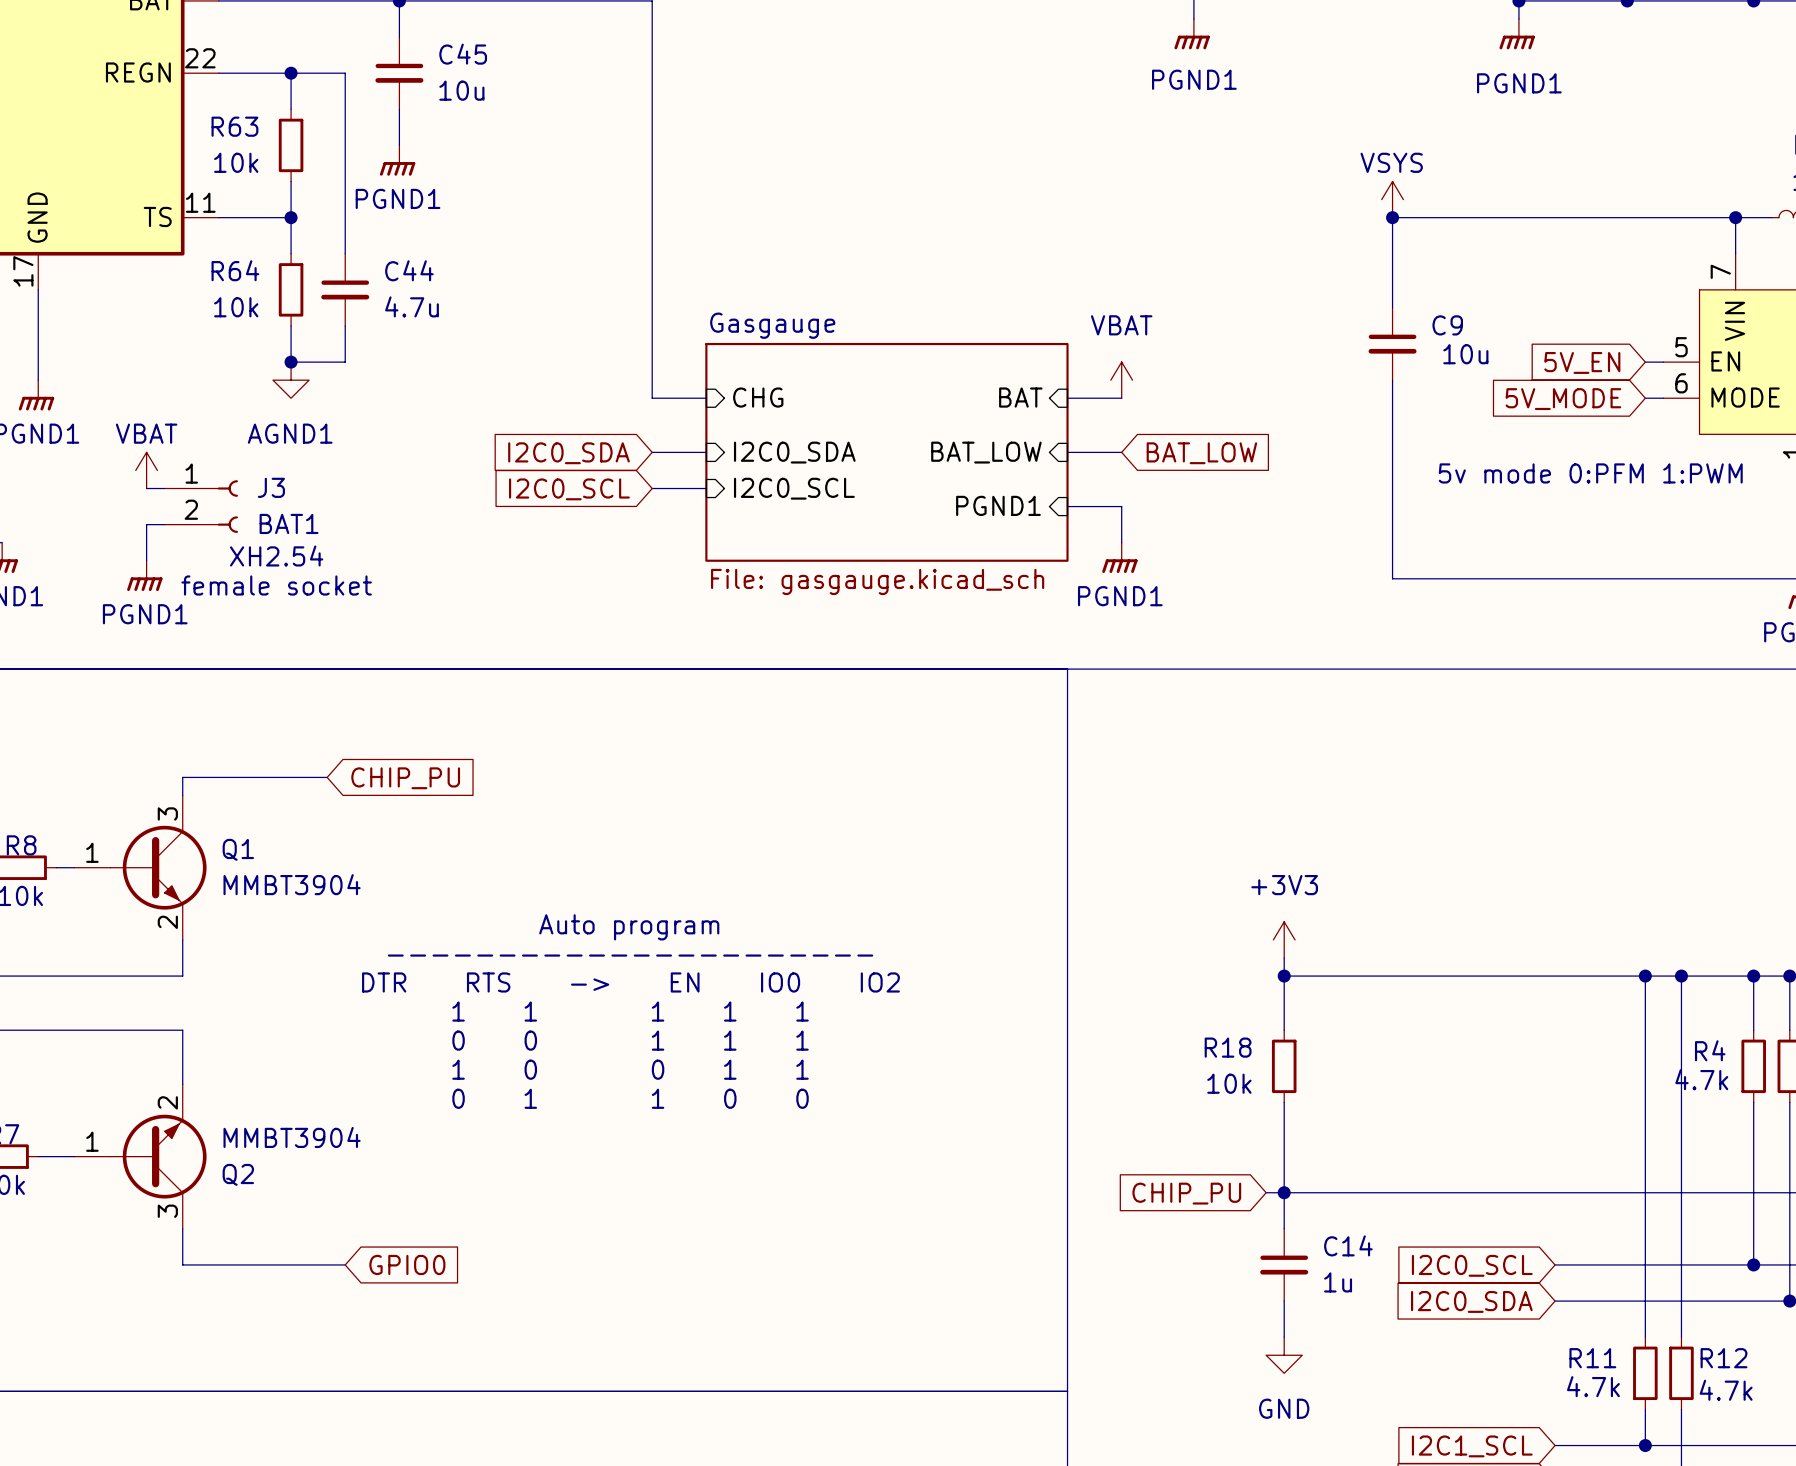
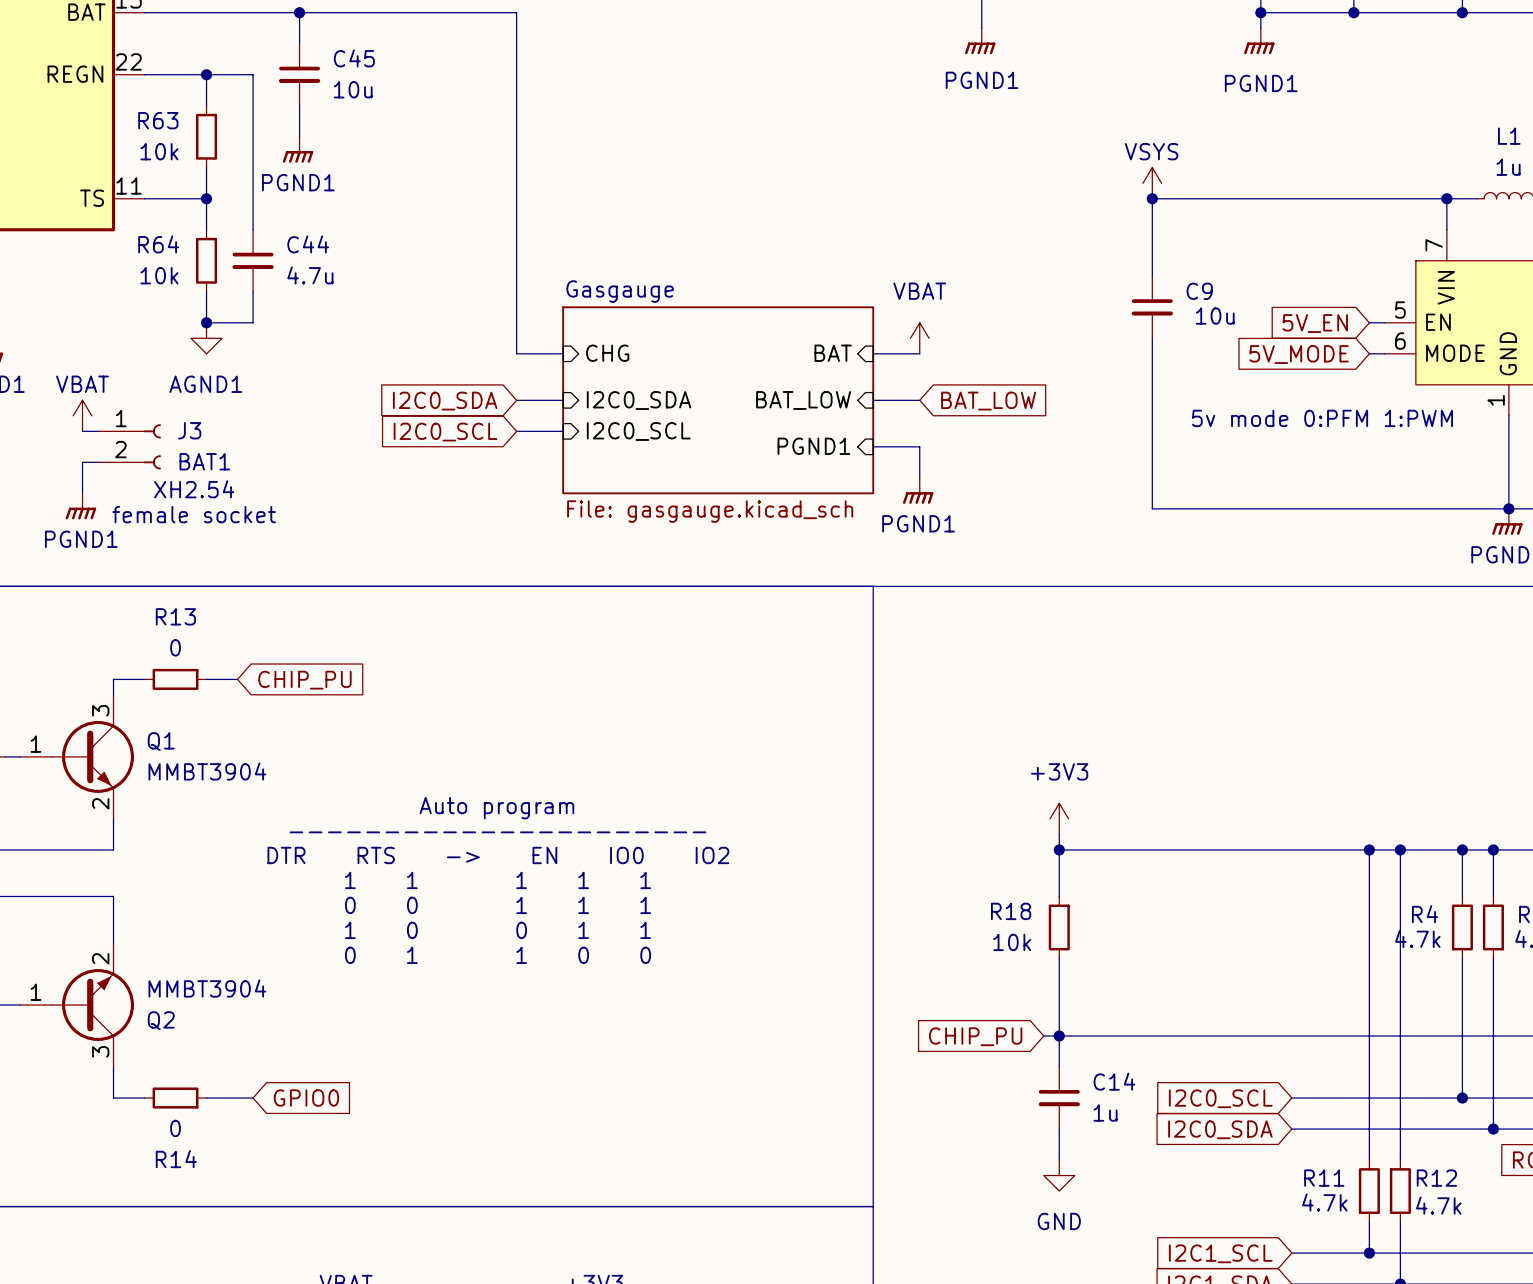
wire: (218, 777) (291, 777) -> none
R13: none -> 0 (175, 679)
wire: (218, 1264) (291, 1264) -> none
R14: none -> 0 (175, 1098)

